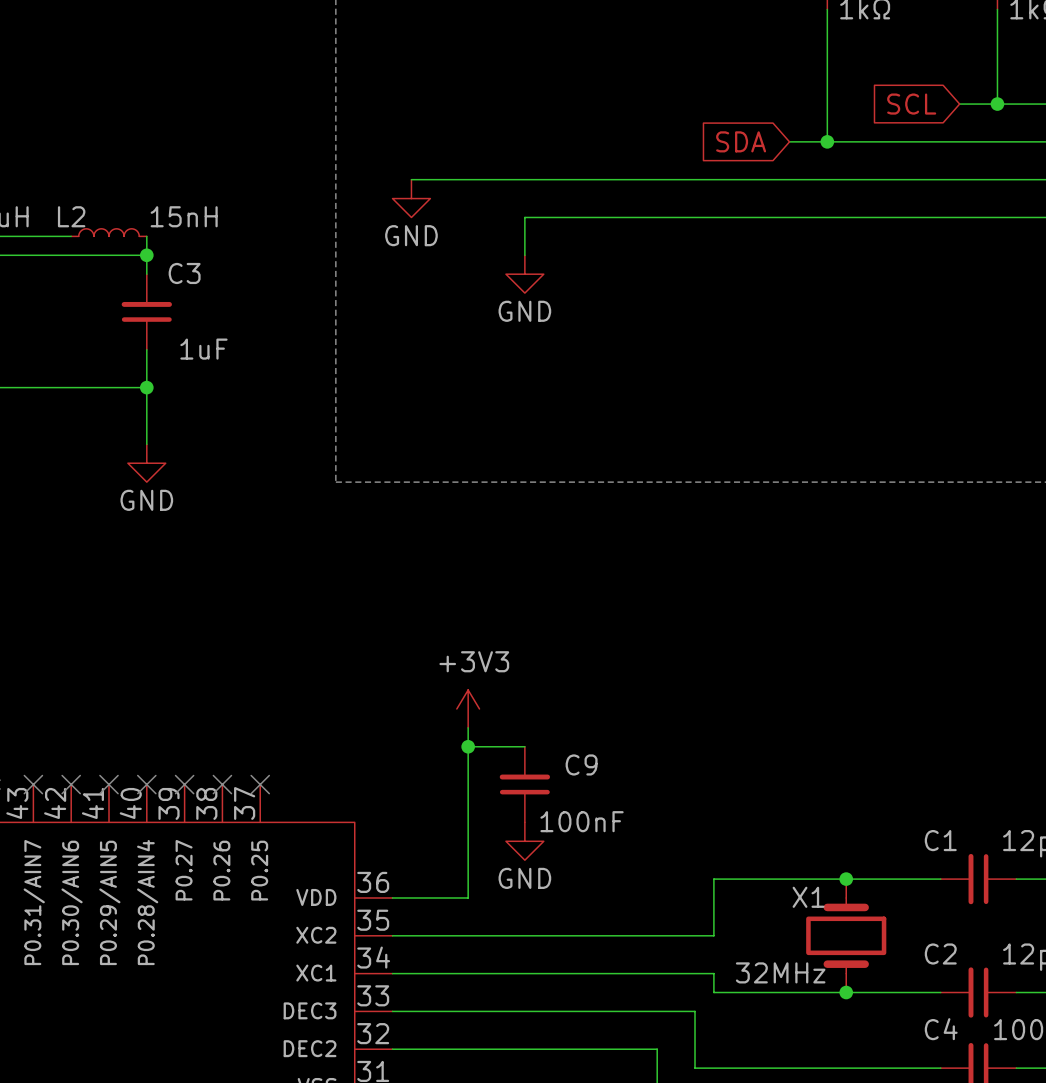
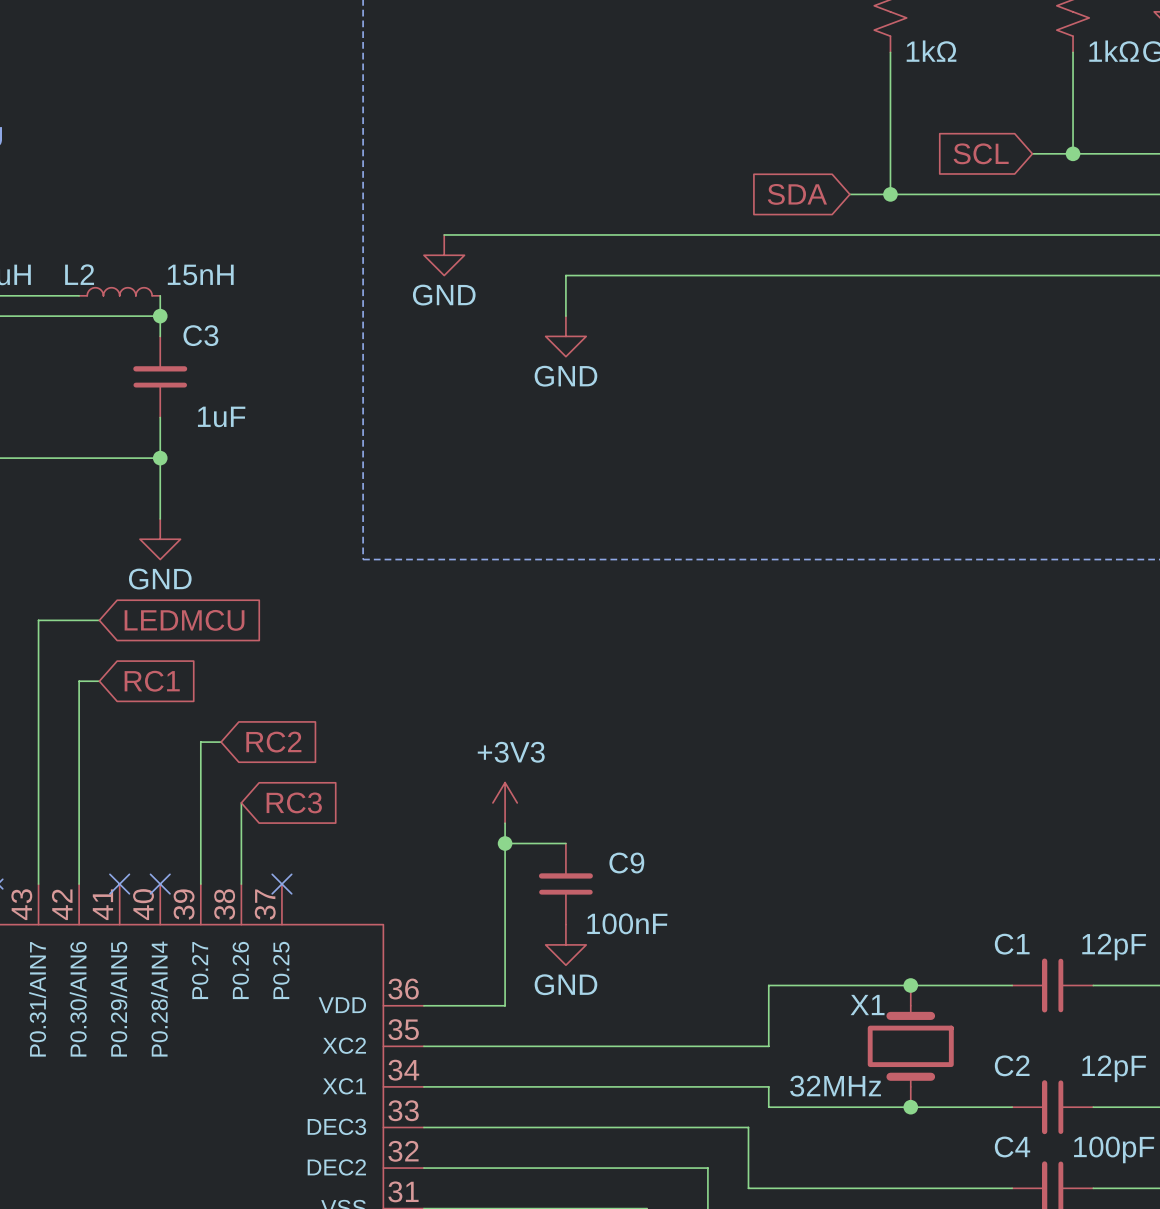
wire: none -> (99, 620) (38, 620) (38, 884)
global label: none -> LEDMCU (184, 620)
wire: none -> (99, 681) (79, 681) (79, 884)
global label: none -> RC1 (152, 681)
wire: none -> (221, 742) (200, 742) (200, 884)
global label: none -> RC2 (273, 742)
wire: none -> (241, 802) (241, 884)
global label: none -> RC3 (294, 802)
no-connect mark: (33, 784) -> none
no-connect mark: (71, 784) -> none
no-connect mark: (184, 784) -> none
no-connect mark: (222, 784) -> none

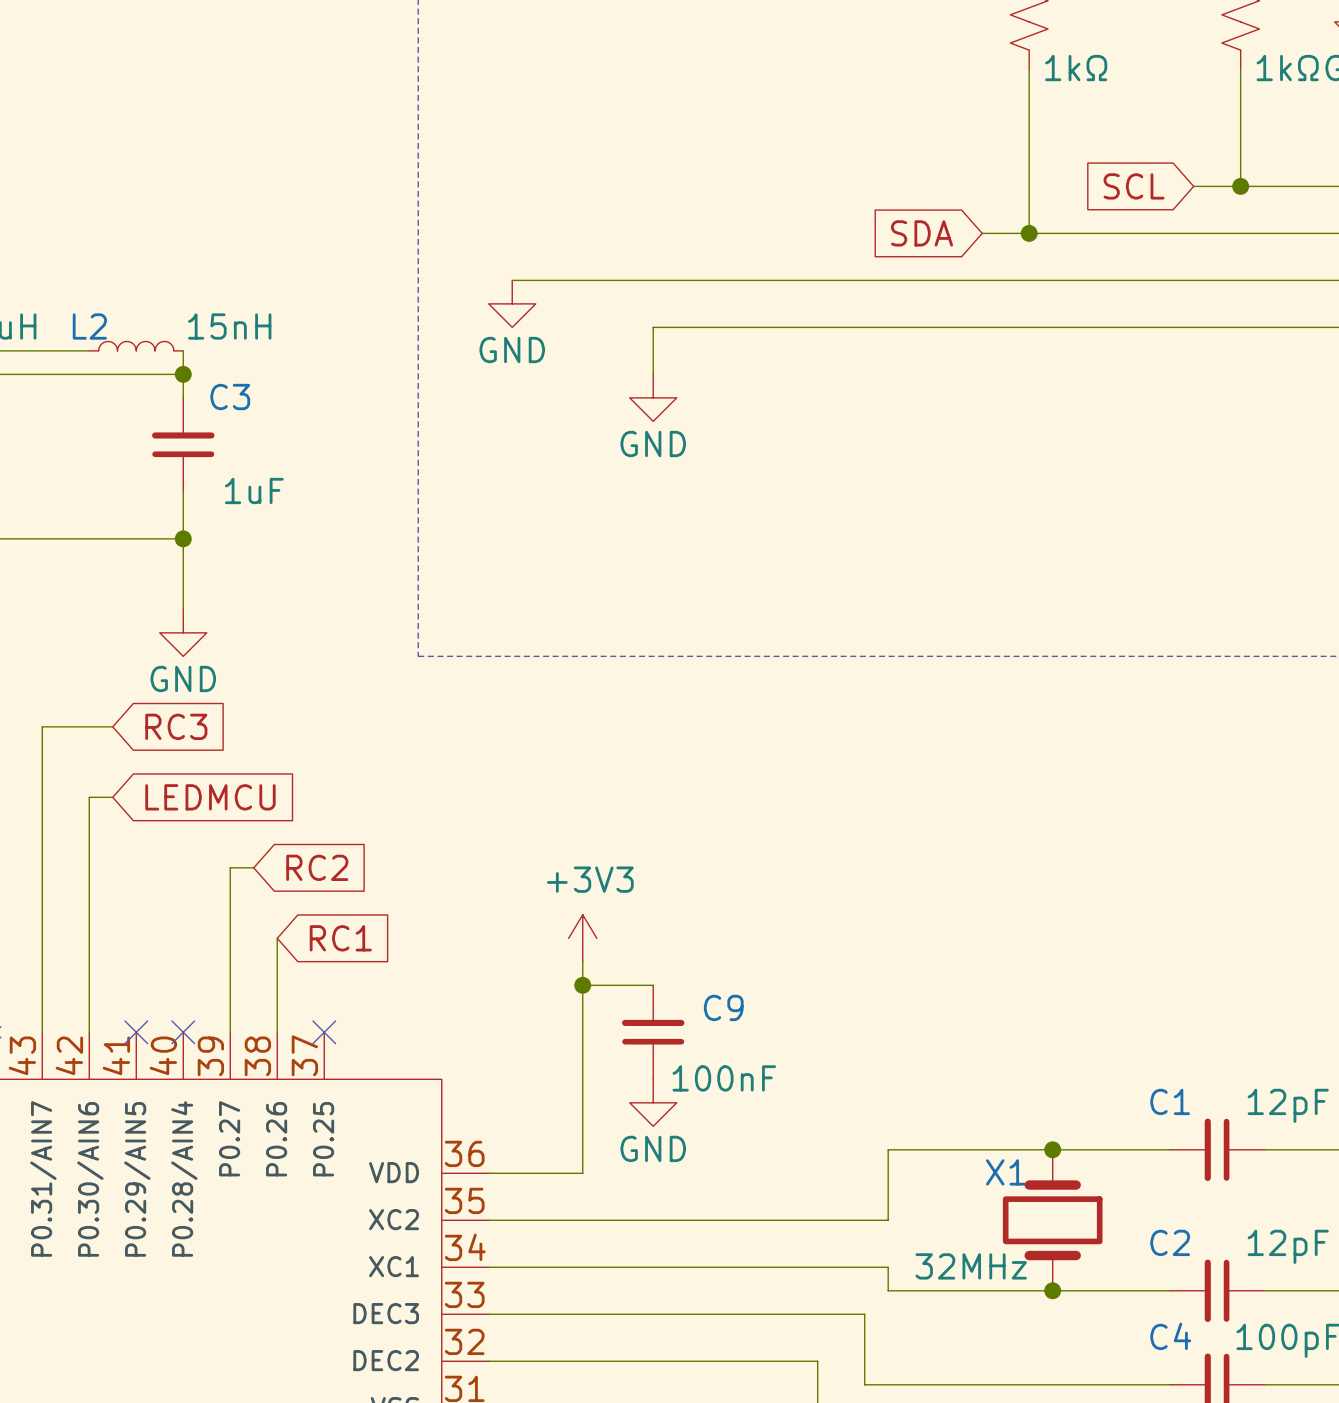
global label: LEDMCU (184, 620) -> RC3 (176, 726)
global label: RC1 (152, 681) -> LEDMCU (210, 797)
global label: RC3 (294, 802) -> RC1 (340, 938)

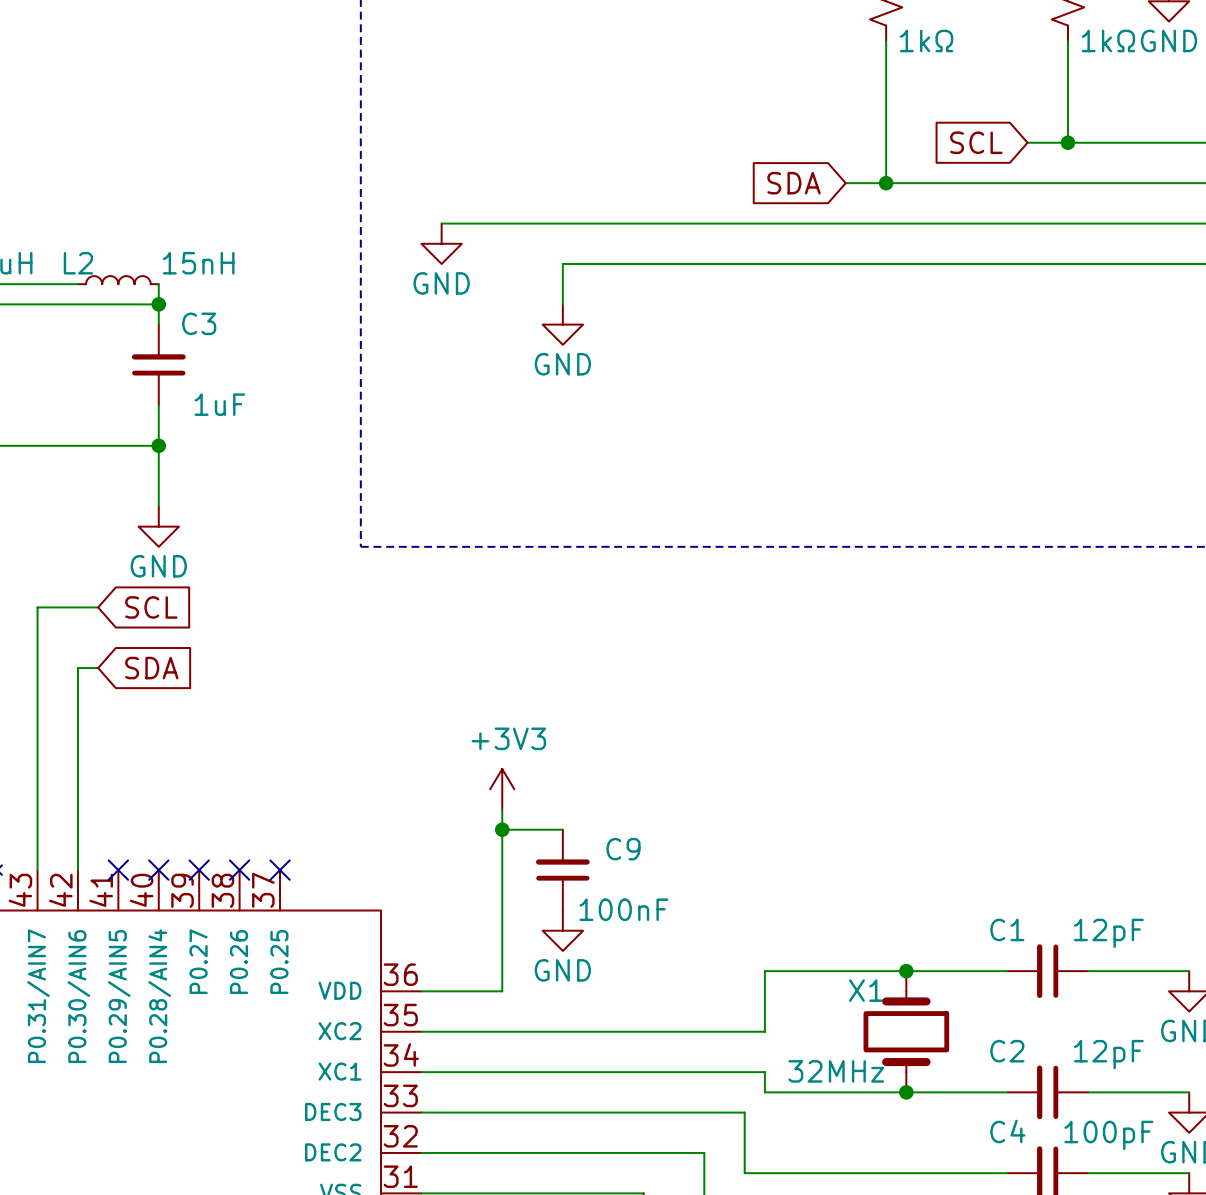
global label: RC3 (176, 726) -> SCL (151, 607)
global label: LEDMCU (210, 797) -> SDA (151, 668)
wire: (253, 867) (230, 867) (230, 1032) -> none
global label: RC2 (317, 867) -> none
wire: (277, 938) (277, 1032) -> none
global label: RC1 (340, 938) -> none
no-connect mark: none -> (199, 870)
no-connect mark: none -> (239, 870)

